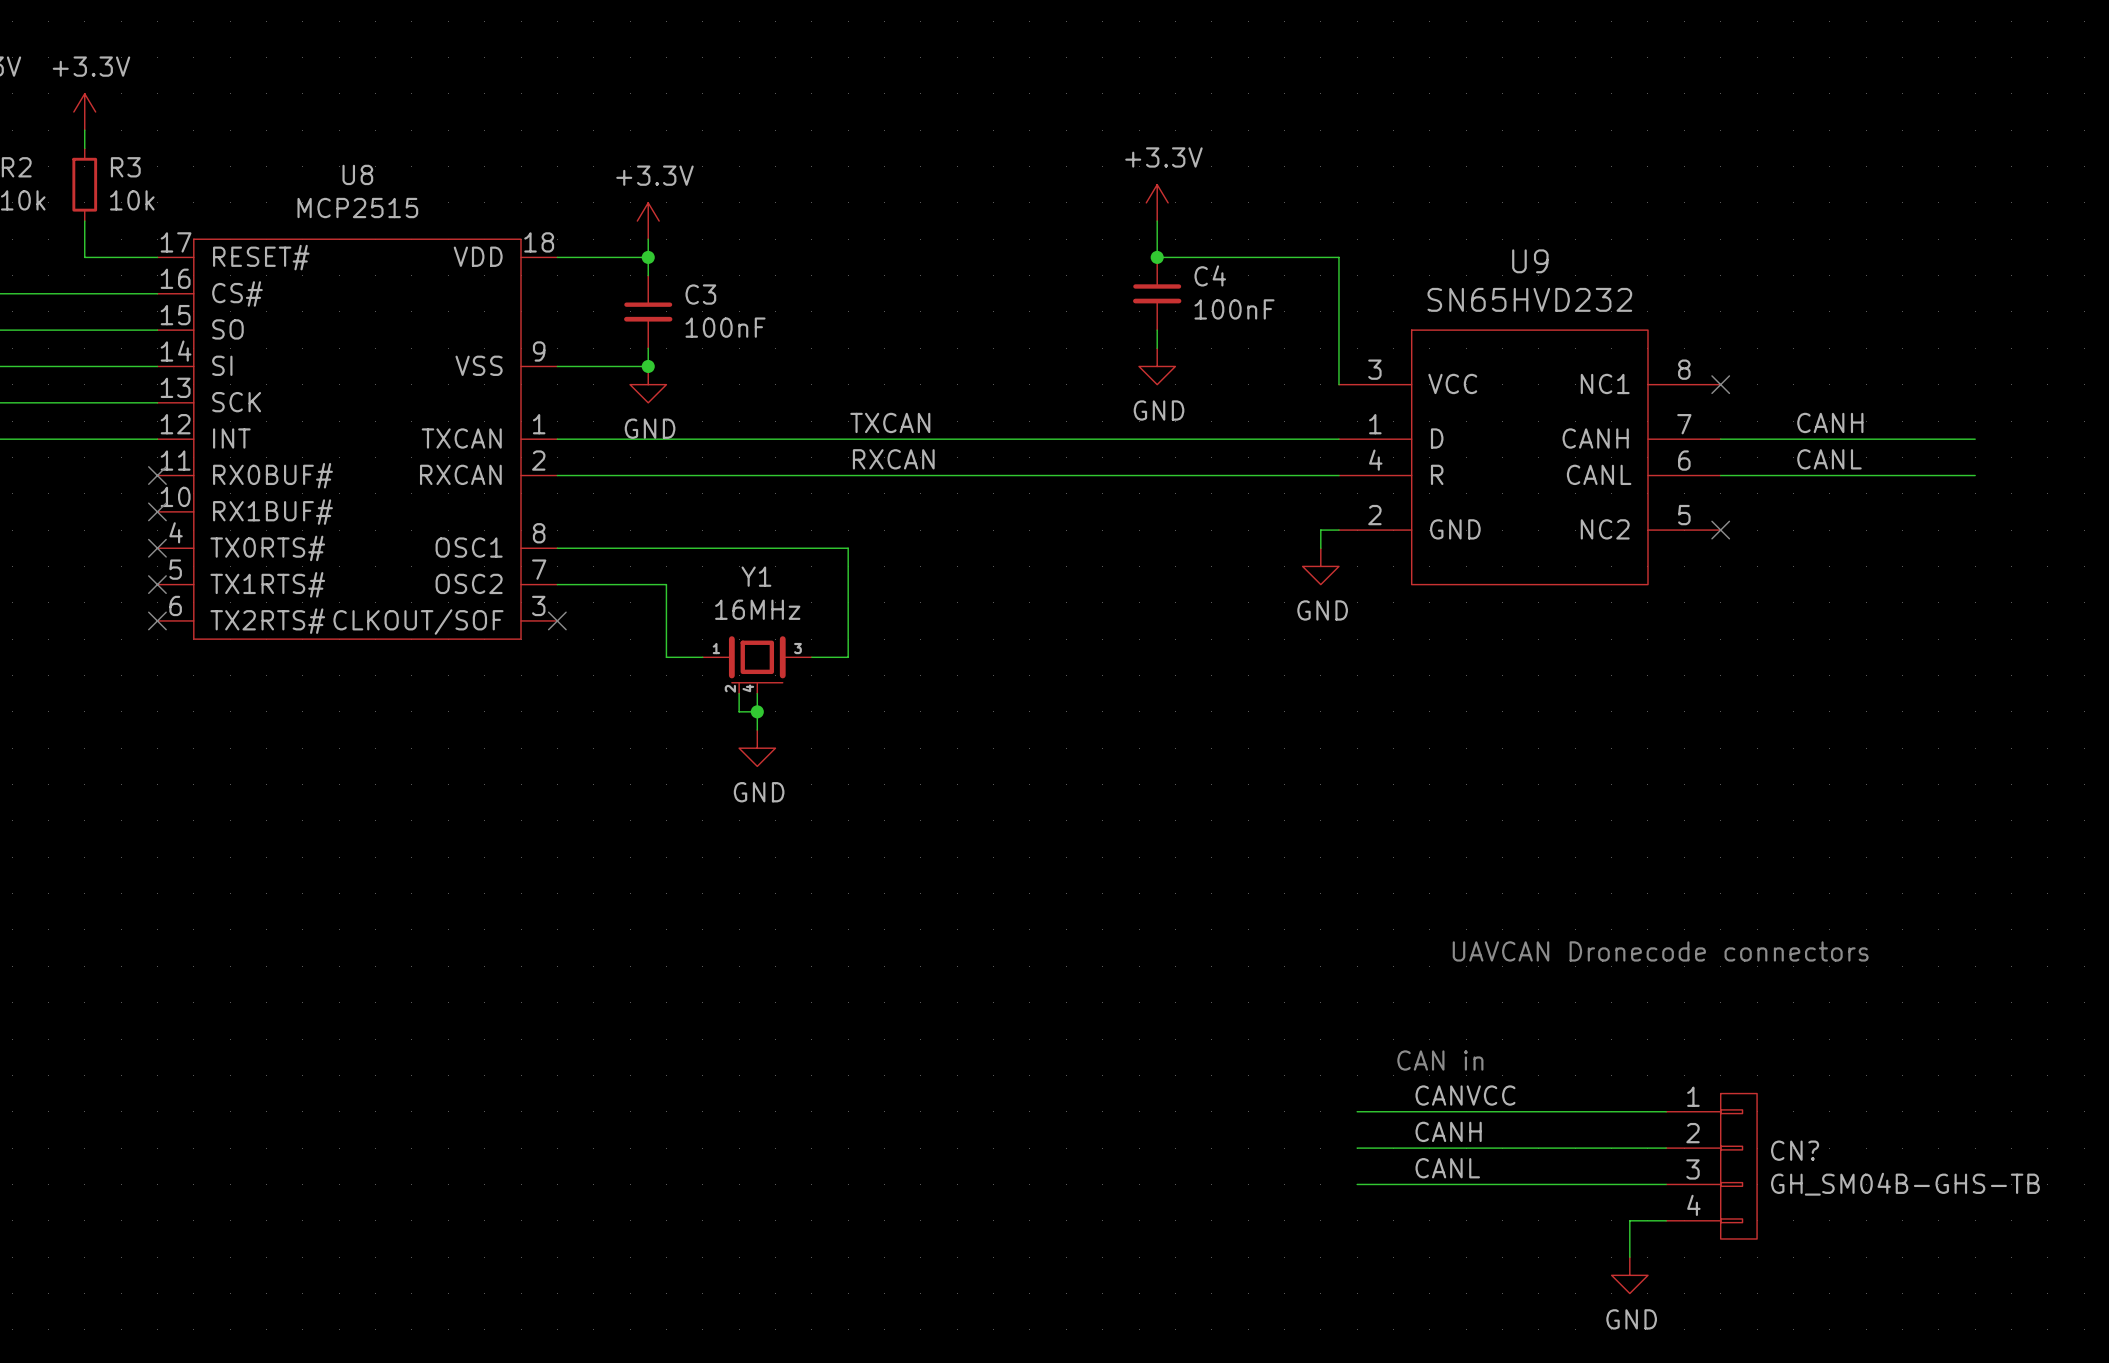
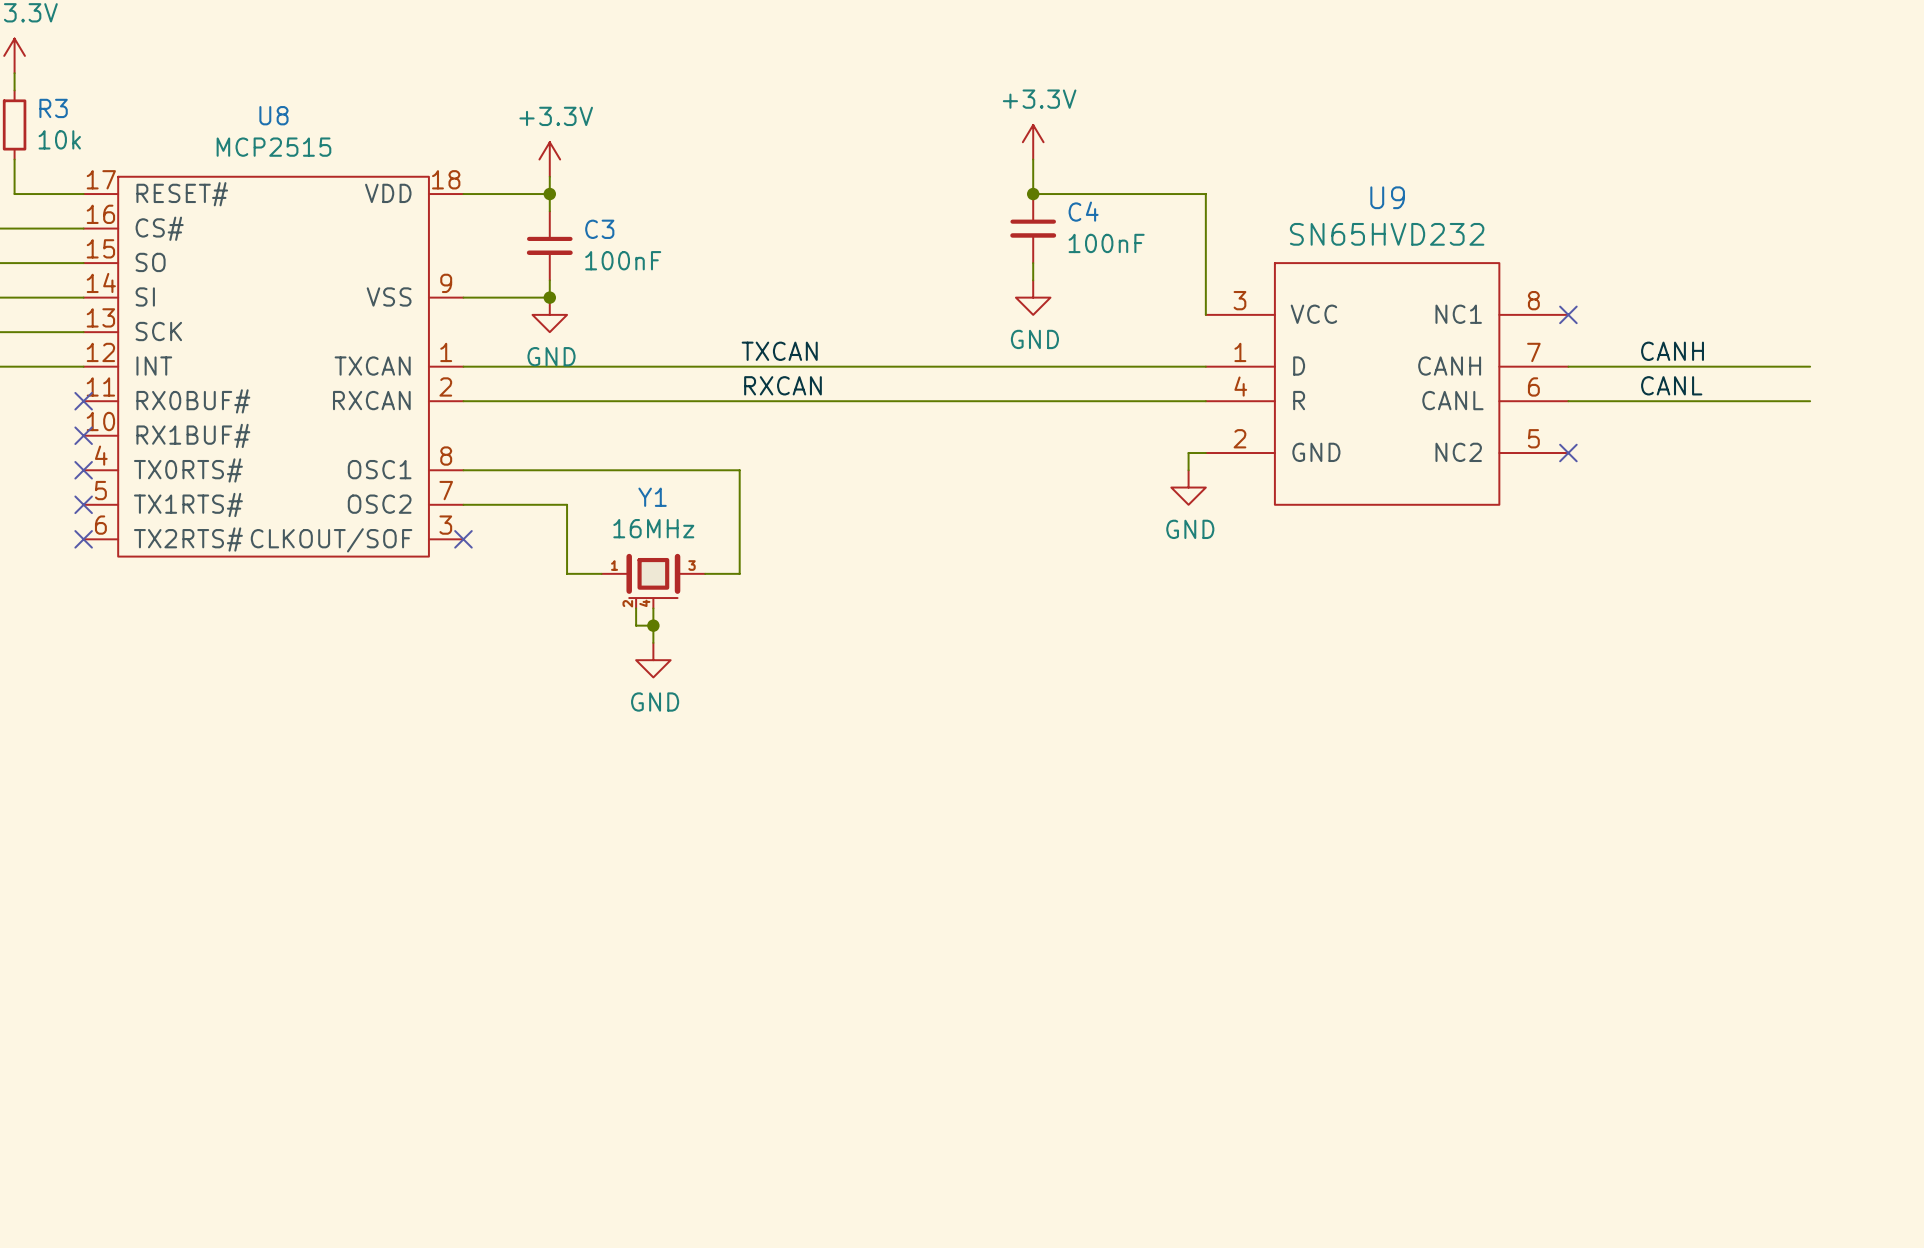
text: UAVCAN Dronecode connectors (1660, 951) -> none
text: CAN in (1440, 1060) -> none
label: CANVCC (1465, 1095) -> none
wire: (1357, 1111) (1666, 1111) -> none
label: CANH (1448, 1131) -> none
wire: (1357, 1148) (1666, 1148) -> none
CN?: GH_SM04B-GHS-TB (1711, 1166) -> none
label: CANL (1447, 1168) -> none
wire: (1357, 1184) (1666, 1184) -> none
wire: (1666, 1220) (1629, 1220) (1629, 1257) -> none
power symbol: GND (1629, 1275) -> none

